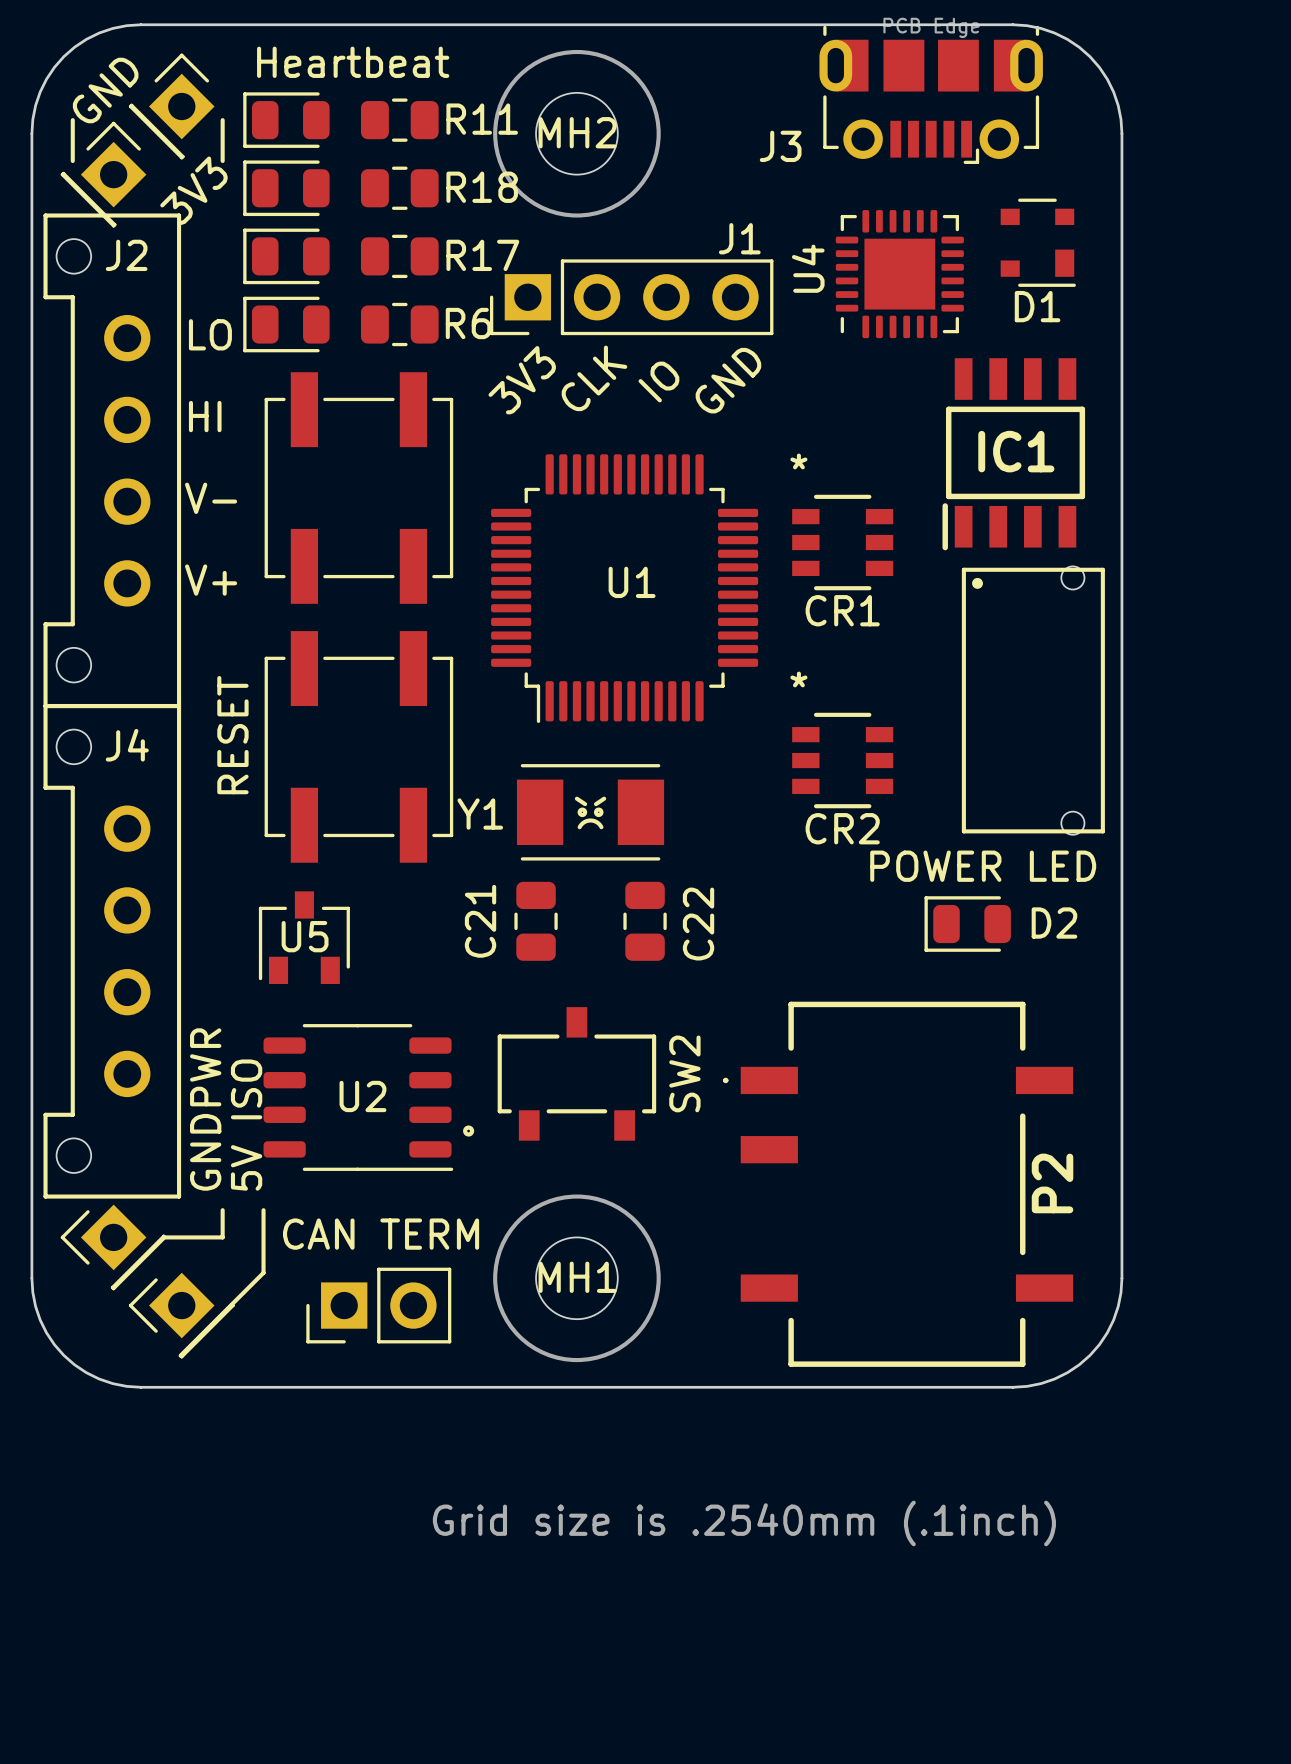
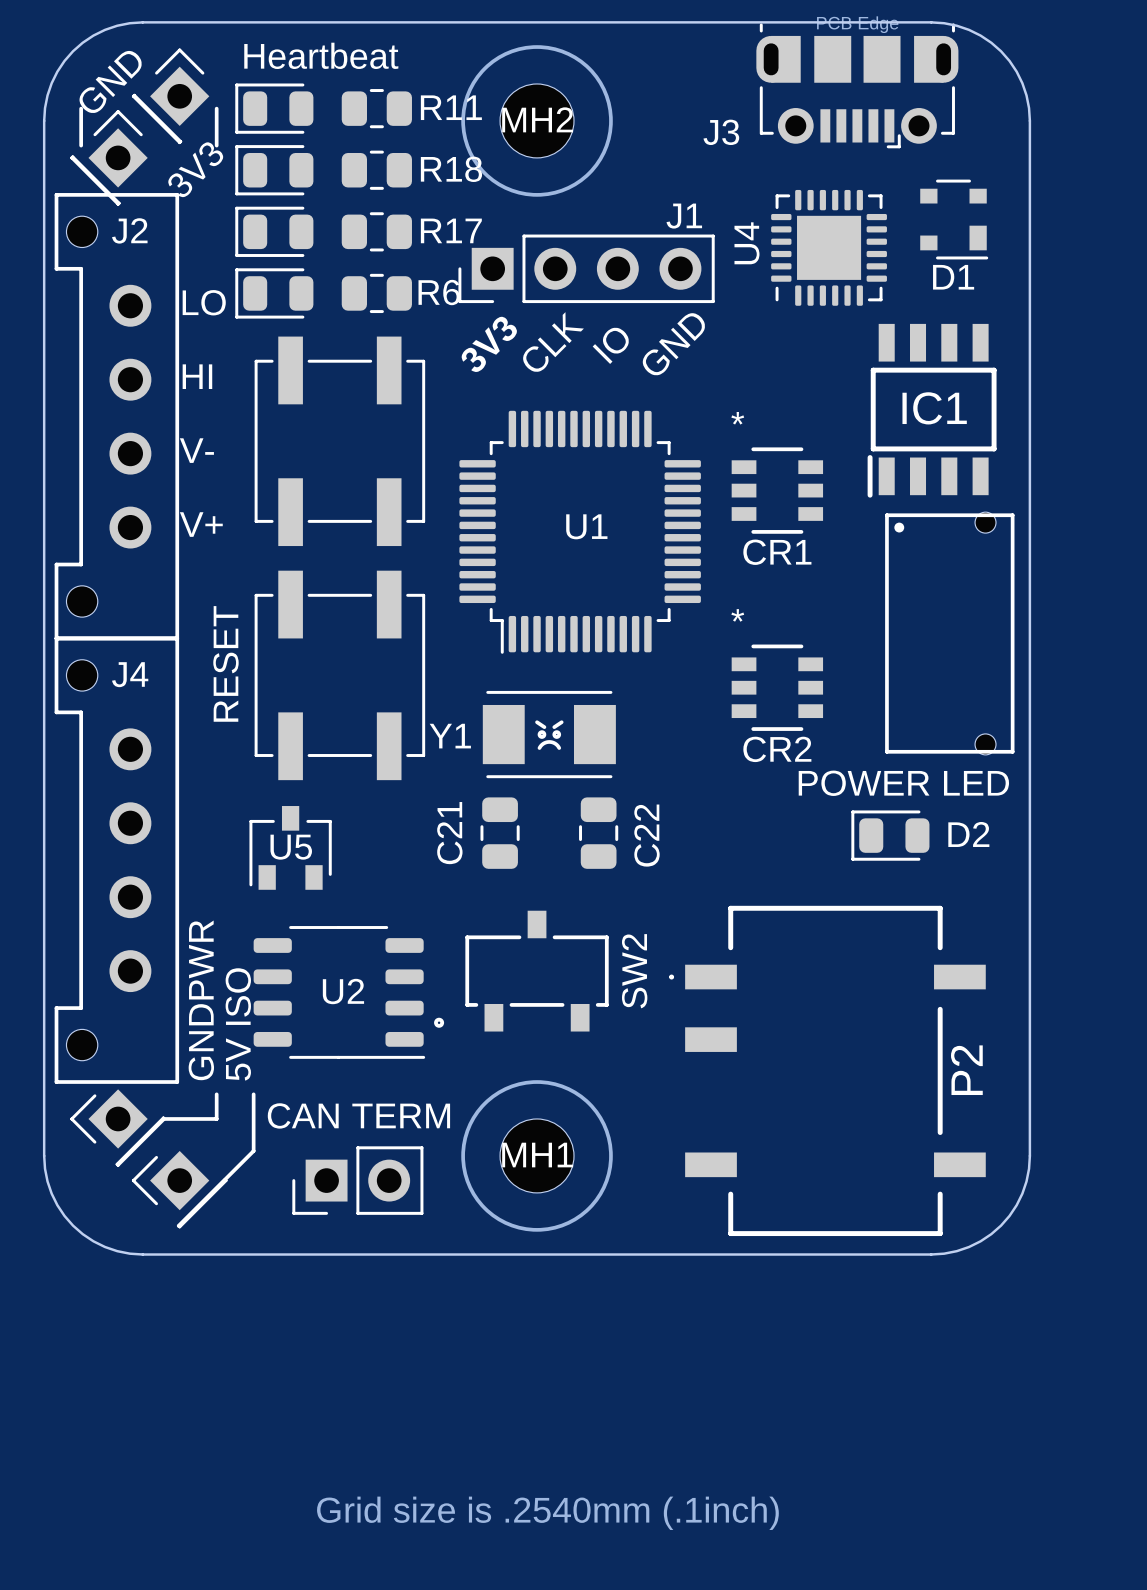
text position: Grid size is .2540mm (.1inch) (744, 1523) -> Grid size is .2540mm (.1inch) (547, 1513)

